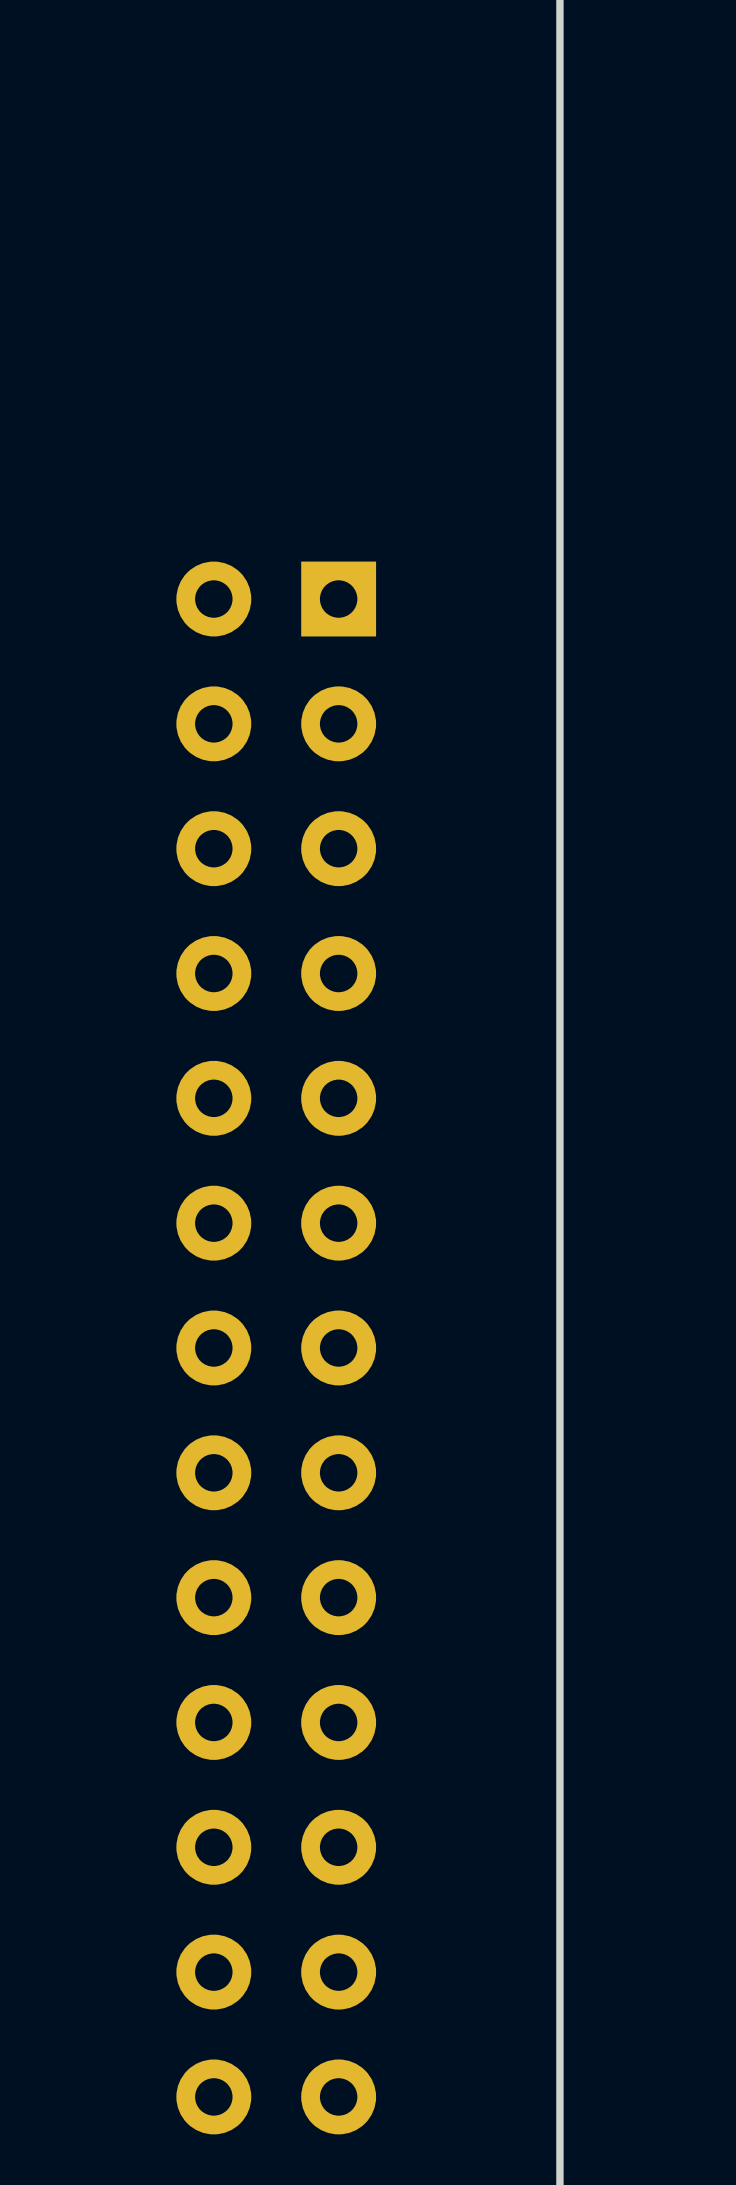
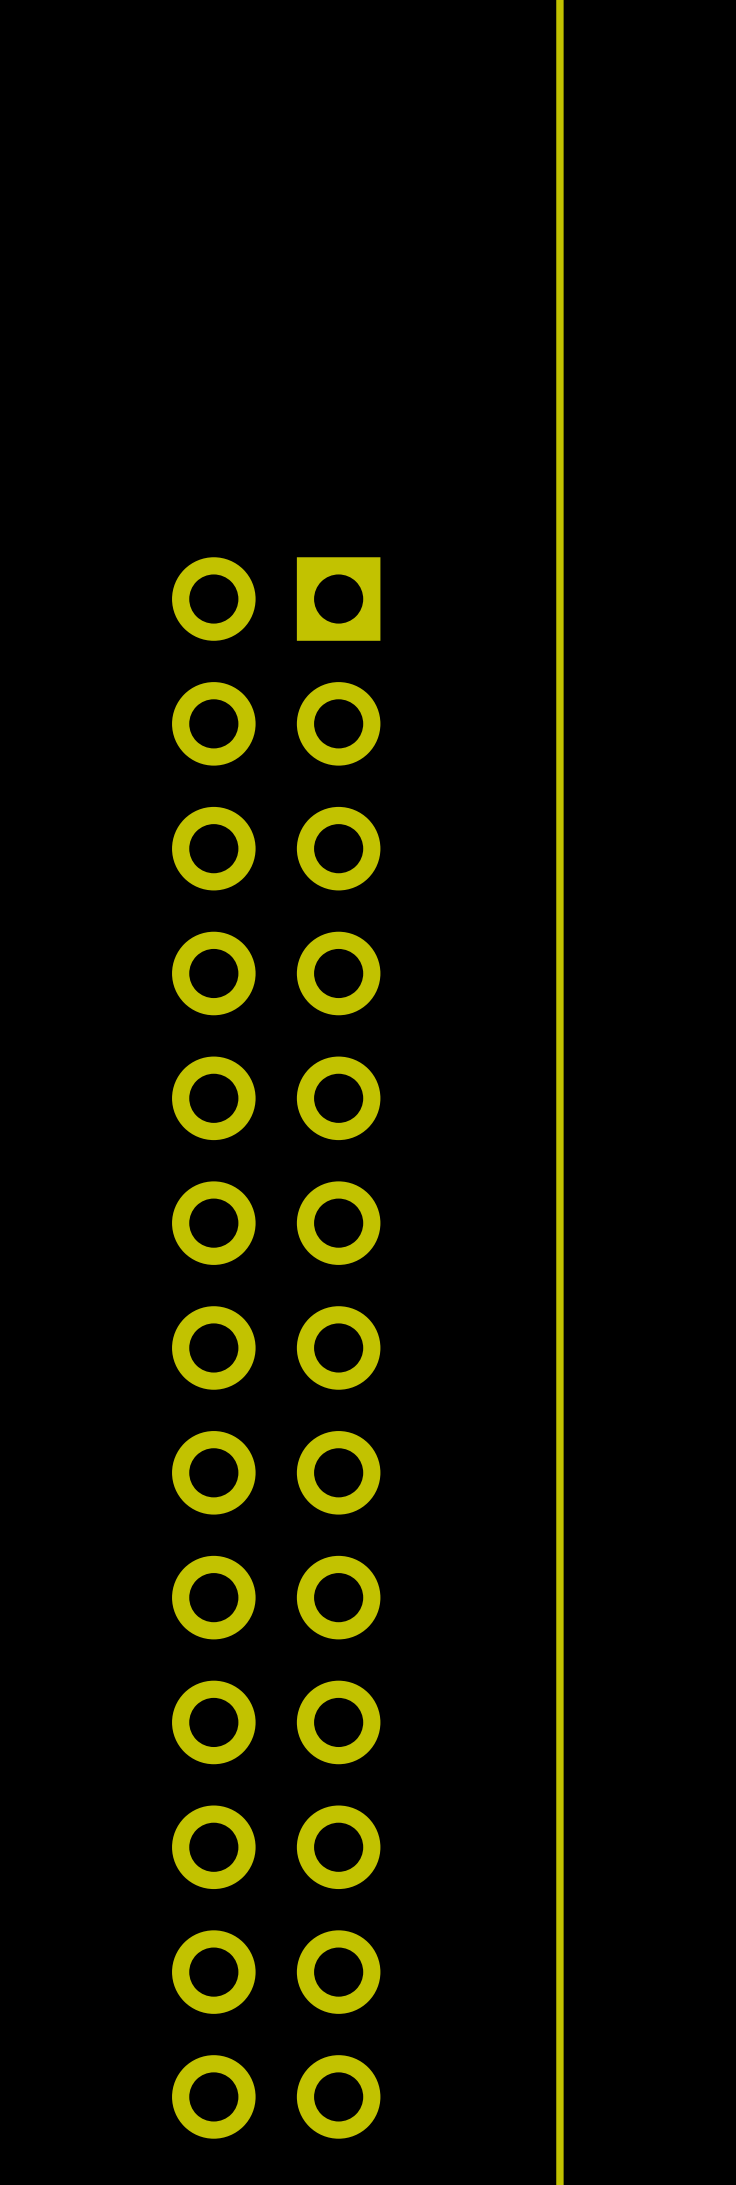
part footprint: [176, 561, 377, 2135] -> [172, 557, 381, 2139]

